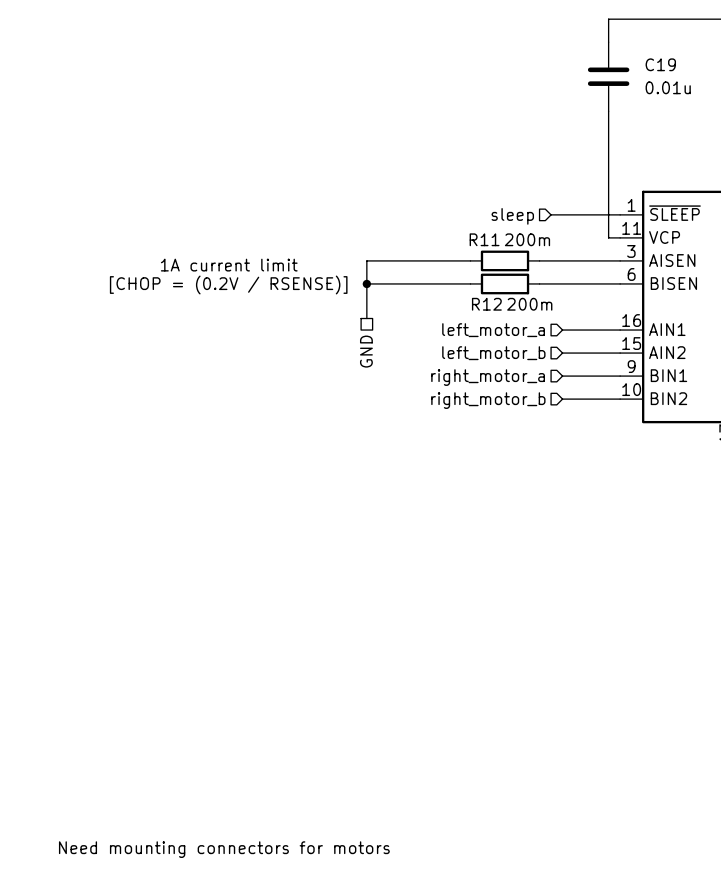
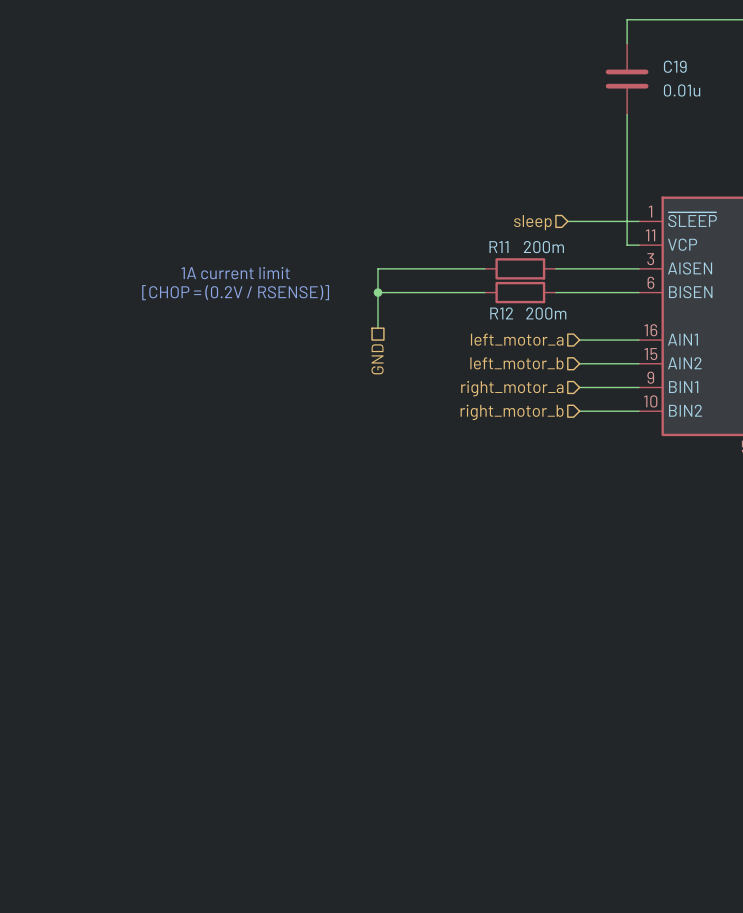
text: Need mounting connectors for motors (224, 849) -> none

